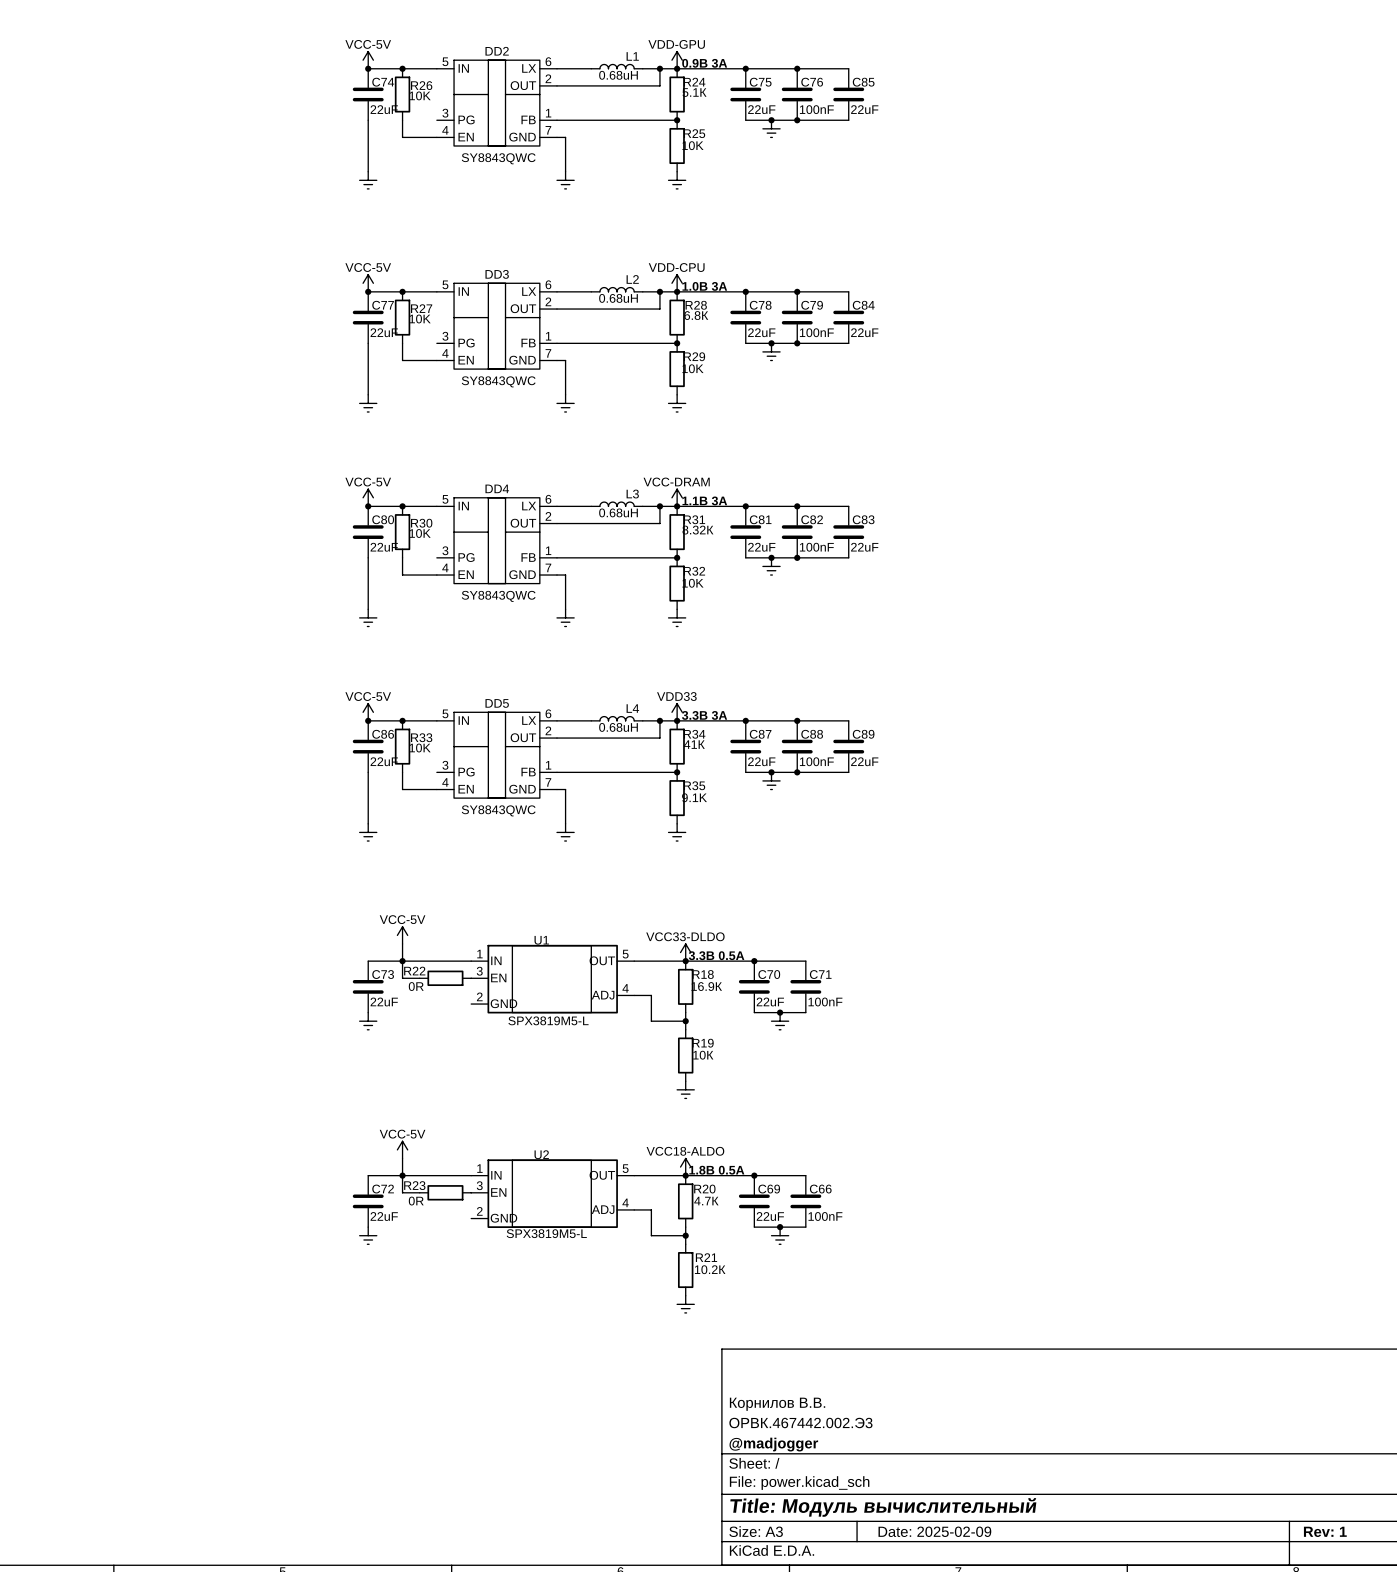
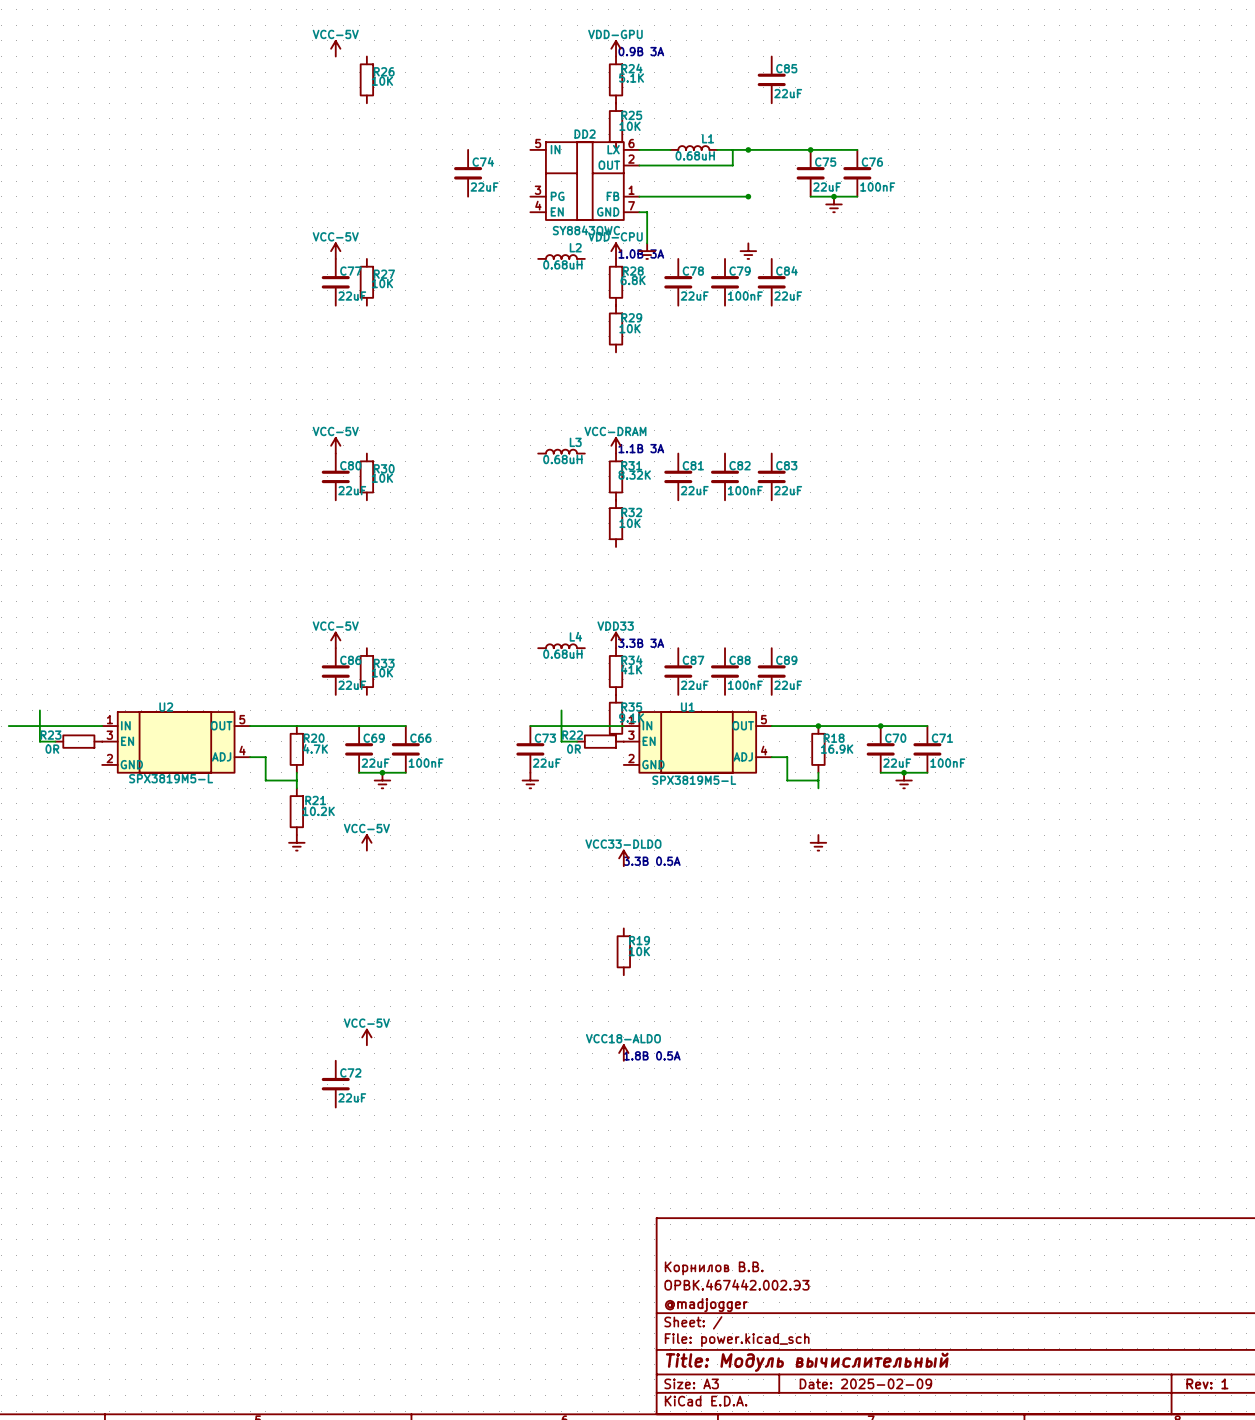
L1 position: (617, 66) -> (693, 148)
wire: (368, 68) (436, 68) -> none
junction: (368, 68) -> none
junction: (402, 68) -> none
wire: (556, 68) (591, 68) -> none
wire: (642, 68) (848, 68) -> none
wire: (659, 68) (659, 85) (556, 85) -> none
junction: (659, 68) -> none
junction: (677, 68) -> none
junction: (745, 68) -> none
junction: (797, 68) -> none
C74 position: (368, 94) -> (468, 173)
C75 position: (745, 94) -> (810, 173)
C76 position: (797, 94) -> (857, 173)
DD2 position: (496, 103) -> (584, 181)
wire: (368, 120) (368, 171) -> none
wire: (402, 120) (402, 137) (436, 137) -> none
wire: (556, 120) (677, 120) -> none
junction: (677, 120) -> none
wire: (745, 120) (848, 120) -> none
junction: (771, 120) -> none
junction: (797, 120) -> none
power symbol: (771, 128) -> none
wire: (556, 137) (565, 137) (565, 171) -> none
wire: none -> (639, 149) (670, 149)
wire: none -> (717, 149) (857, 149)
wire: none -> (732, 149) (732, 165) (639, 165)
junction: none -> (748, 149)
junction: none -> (810, 149)
power symbol: (368, 180) -> none
power symbol: (565, 180) -> none
power symbol: (677, 180) -> none
wire: none -> (639, 196) (748, 196)
junction: none -> (748, 196)
wire: none -> (810, 196) (857, 196)
junction: none -> (833, 196)
power symbol: none -> (833, 204)
wire: none -> (639, 212) (647, 212) (647, 243)
power symbol: none -> (647, 251)
power symbol: none -> (748, 251)
wire: (368, 291) (436, 291) -> none
junction: (368, 291) -> none
junction: (402, 291) -> none
wire: (556, 291) (591, 291) -> none
wire: (642, 291) (848, 291) -> none
wire: (659, 291) (659, 309) (556, 309) -> none
junction: (659, 291) -> none
junction: (677, 291) -> none
junction: (745, 291) -> none
junction: (797, 291) -> none
DD3: (496, 326) -> none
wire: (368, 343) (368, 394) -> none
wire: (402, 343) (402, 360) (436, 360) -> none
wire: (556, 343) (677, 343) -> none
junction: (677, 343) -> none
wire: (745, 343) (848, 343) -> none
junction: (771, 343) -> none
junction: (797, 343) -> none
power symbol: (771, 351) -> none
wire: (556, 360) (565, 360) (565, 394) -> none
power symbol: (368, 403) -> none
power symbol: (565, 403) -> none
power symbol: (677, 403) -> none
wire: (368, 506) (436, 506) -> none
junction: (368, 506) -> none
junction: (402, 506) -> none
wire: (556, 506) (591, 506) -> none
wire: (642, 506) (848, 506) -> none
wire: (659, 506) (659, 523) (556, 523) -> none
junction: (659, 506) -> none
junction: (677, 506) -> none
junction: (745, 506) -> none
junction: (797, 506) -> none
DD4: (496, 540) -> none
wire: (368, 557) (368, 609) -> none
wire: (402, 557) (402, 575) (436, 575) -> none
wire: (556, 557) (677, 557) -> none
junction: (677, 557) -> none
wire: (745, 557) (848, 557) -> none
junction: (771, 557) -> none
junction: (797, 557) -> none
power symbol: (771, 566) -> none
wire: (556, 575) (565, 575) (565, 609) -> none
power symbol: (368, 617) -> none
power symbol: (565, 617) -> none
power symbol: (677, 617) -> none
wire: (368, 720) (436, 720) -> none
junction: (368, 720) -> none
junction: (402, 720) -> none
wire: (556, 720) (591, 720) -> none
wire: (642, 720) (848, 720) -> none
wire: (659, 720) (659, 738) (556, 738) -> none
junction: (659, 720) -> none
junction: (677, 720) -> none
junction: (745, 720) -> none
junction: (797, 720) -> none
DD5: (496, 755) -> none
wire: (368, 772) (368, 823) -> none
wire: (402, 772) (402, 789) (436, 789) -> none
wire: (556, 772) (677, 772) -> none
junction: (677, 772) -> none
wire: (745, 772) (848, 772) -> (530, 726) (623, 726)
junction: (771, 772) -> none
junction: (797, 772) -> none
power symbol: (771, 780) -> none
wire: none -> (39, 710) (39, 741) (55, 741)
wire: (556, 789) (565, 789) (565, 823) -> none
wire: none -> (561, 710) (561, 741) (577, 741)
wire: none -> (8, 726) (102, 726)
wire: none -> (250, 726) (405, 726)
wire: none -> (771, 726) (927, 726)
junction: none -> (818, 726)
junction: none -> (880, 726)
power symbol: (368, 832) -> none
power symbol position: (565, 832) -> (530, 780)
power symbol: (677, 832) -> none
wire: none -> (250, 757) (265, 757) (265, 780) (296, 780)
wire: none -> (771, 757) (787, 757) (787, 780) (818, 780)
wire: none -> (296, 772) (296, 788)
wire: none -> (359, 772) (405, 772)
junction: none -> (382, 772)
wire: none -> (818, 772) (818, 788)
wire: none -> (880, 772) (927, 772)
junction: none -> (904, 772)
power symbol: none -> (382, 780)
power symbol: none -> (904, 780)
power symbol: none -> (296, 842)
power symbol: none -> (818, 842)
wire: (402, 943) (402, 978) (419, 978) -> none
U1 symbol: [471, 944, 635, 1014] -> [623, 711, 772, 774]
wire: (368, 961) (471, 961) -> none
junction: (402, 961) -> none
wire: (634, 961) (805, 961) -> none
junction: (685, 961) -> none
junction: (754, 961) -> none
R22 position: (445, 978) -> (600, 741)
C73 position: (368, 986) -> (530, 749)
R18 position: (685, 986) -> (818, 749)
C70 position: (754, 986) -> (880, 749)
C71 position: (805, 986) -> (927, 749)
wire: (634, 995) (651, 995) (651, 1021) (685, 1021) -> none
wire: (685, 1012) (685, 1029) -> none
wire: (754, 1012) (805, 1012) -> none
junction: (780, 1012) -> none
power symbol: (368, 1021) -> none
junction: (685, 1021) -> none
power symbol: (780, 1021) -> none
power symbol: (685, 1089) -> none
wire: (402, 1158) (402, 1192) (419, 1192) -> none
U2 symbol: [471, 1159, 635, 1228] -> [102, 711, 251, 774]
wire: (368, 1175) (471, 1175) -> none
junction: (402, 1175) -> none
wire: (634, 1175) (805, 1175) -> none
junction: (685, 1175) -> none
junction: (754, 1175) -> none
R23 position: (445, 1192) -> (78, 741)
R20 position: (685, 1201) -> (296, 749)
C69 position: (754, 1201) -> (359, 749)
C66 position: (805, 1201) -> (405, 749)
wire: (634, 1209) (651, 1209) (651, 1235) (685, 1235) -> none
wire: (685, 1227) (685, 1244) -> none
wire: (754, 1227) (805, 1227) -> none
junction: (780, 1227) -> none
power symbol: (368, 1235) -> none
junction: (685, 1235) -> none
power symbol: (780, 1235) -> none
R21 position: (685, 1270) -> (296, 811)
power symbol: (685, 1304) -> none

